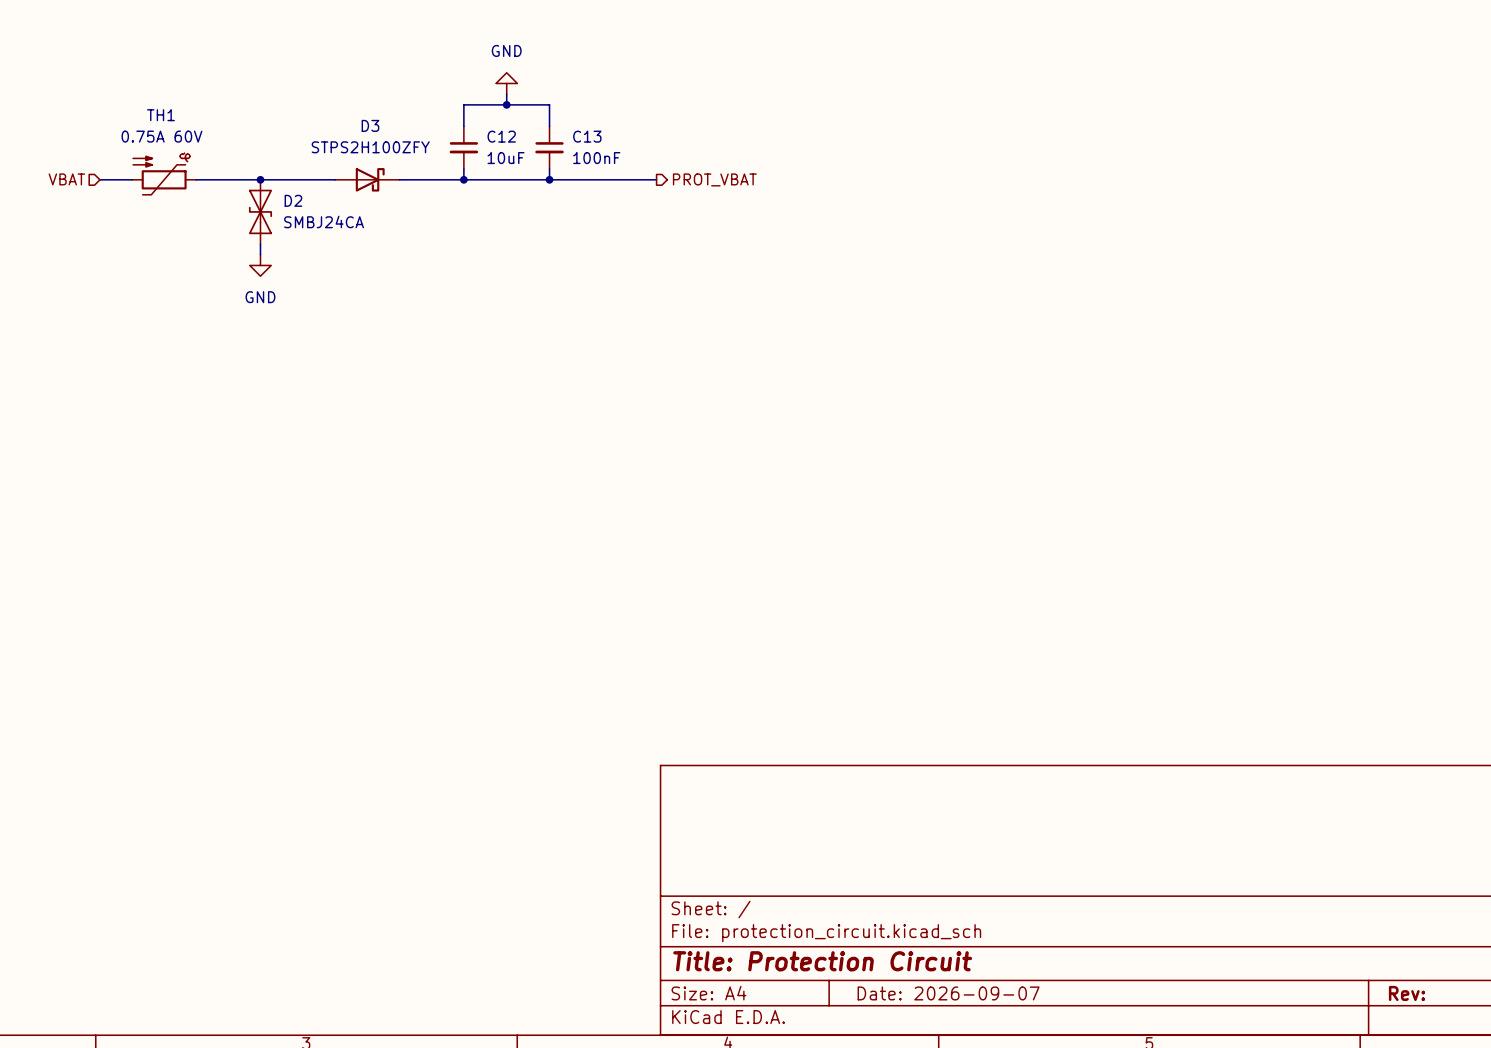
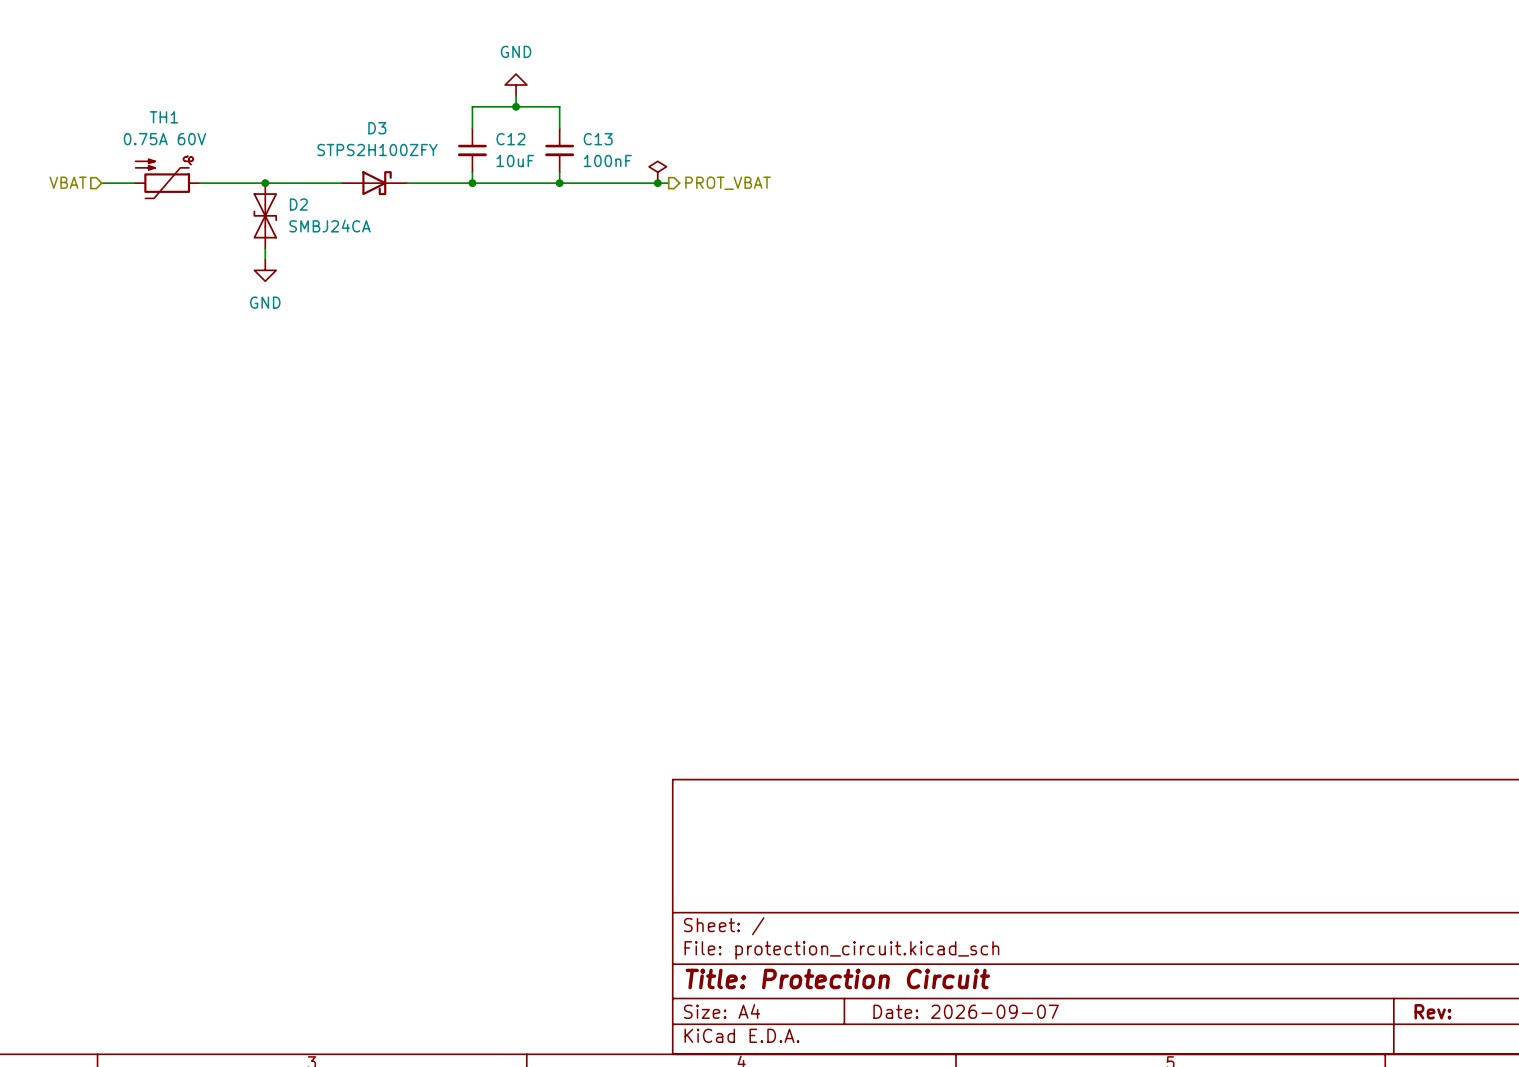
power symbol: none -> (657, 172)
junction: none -> (657, 183)

